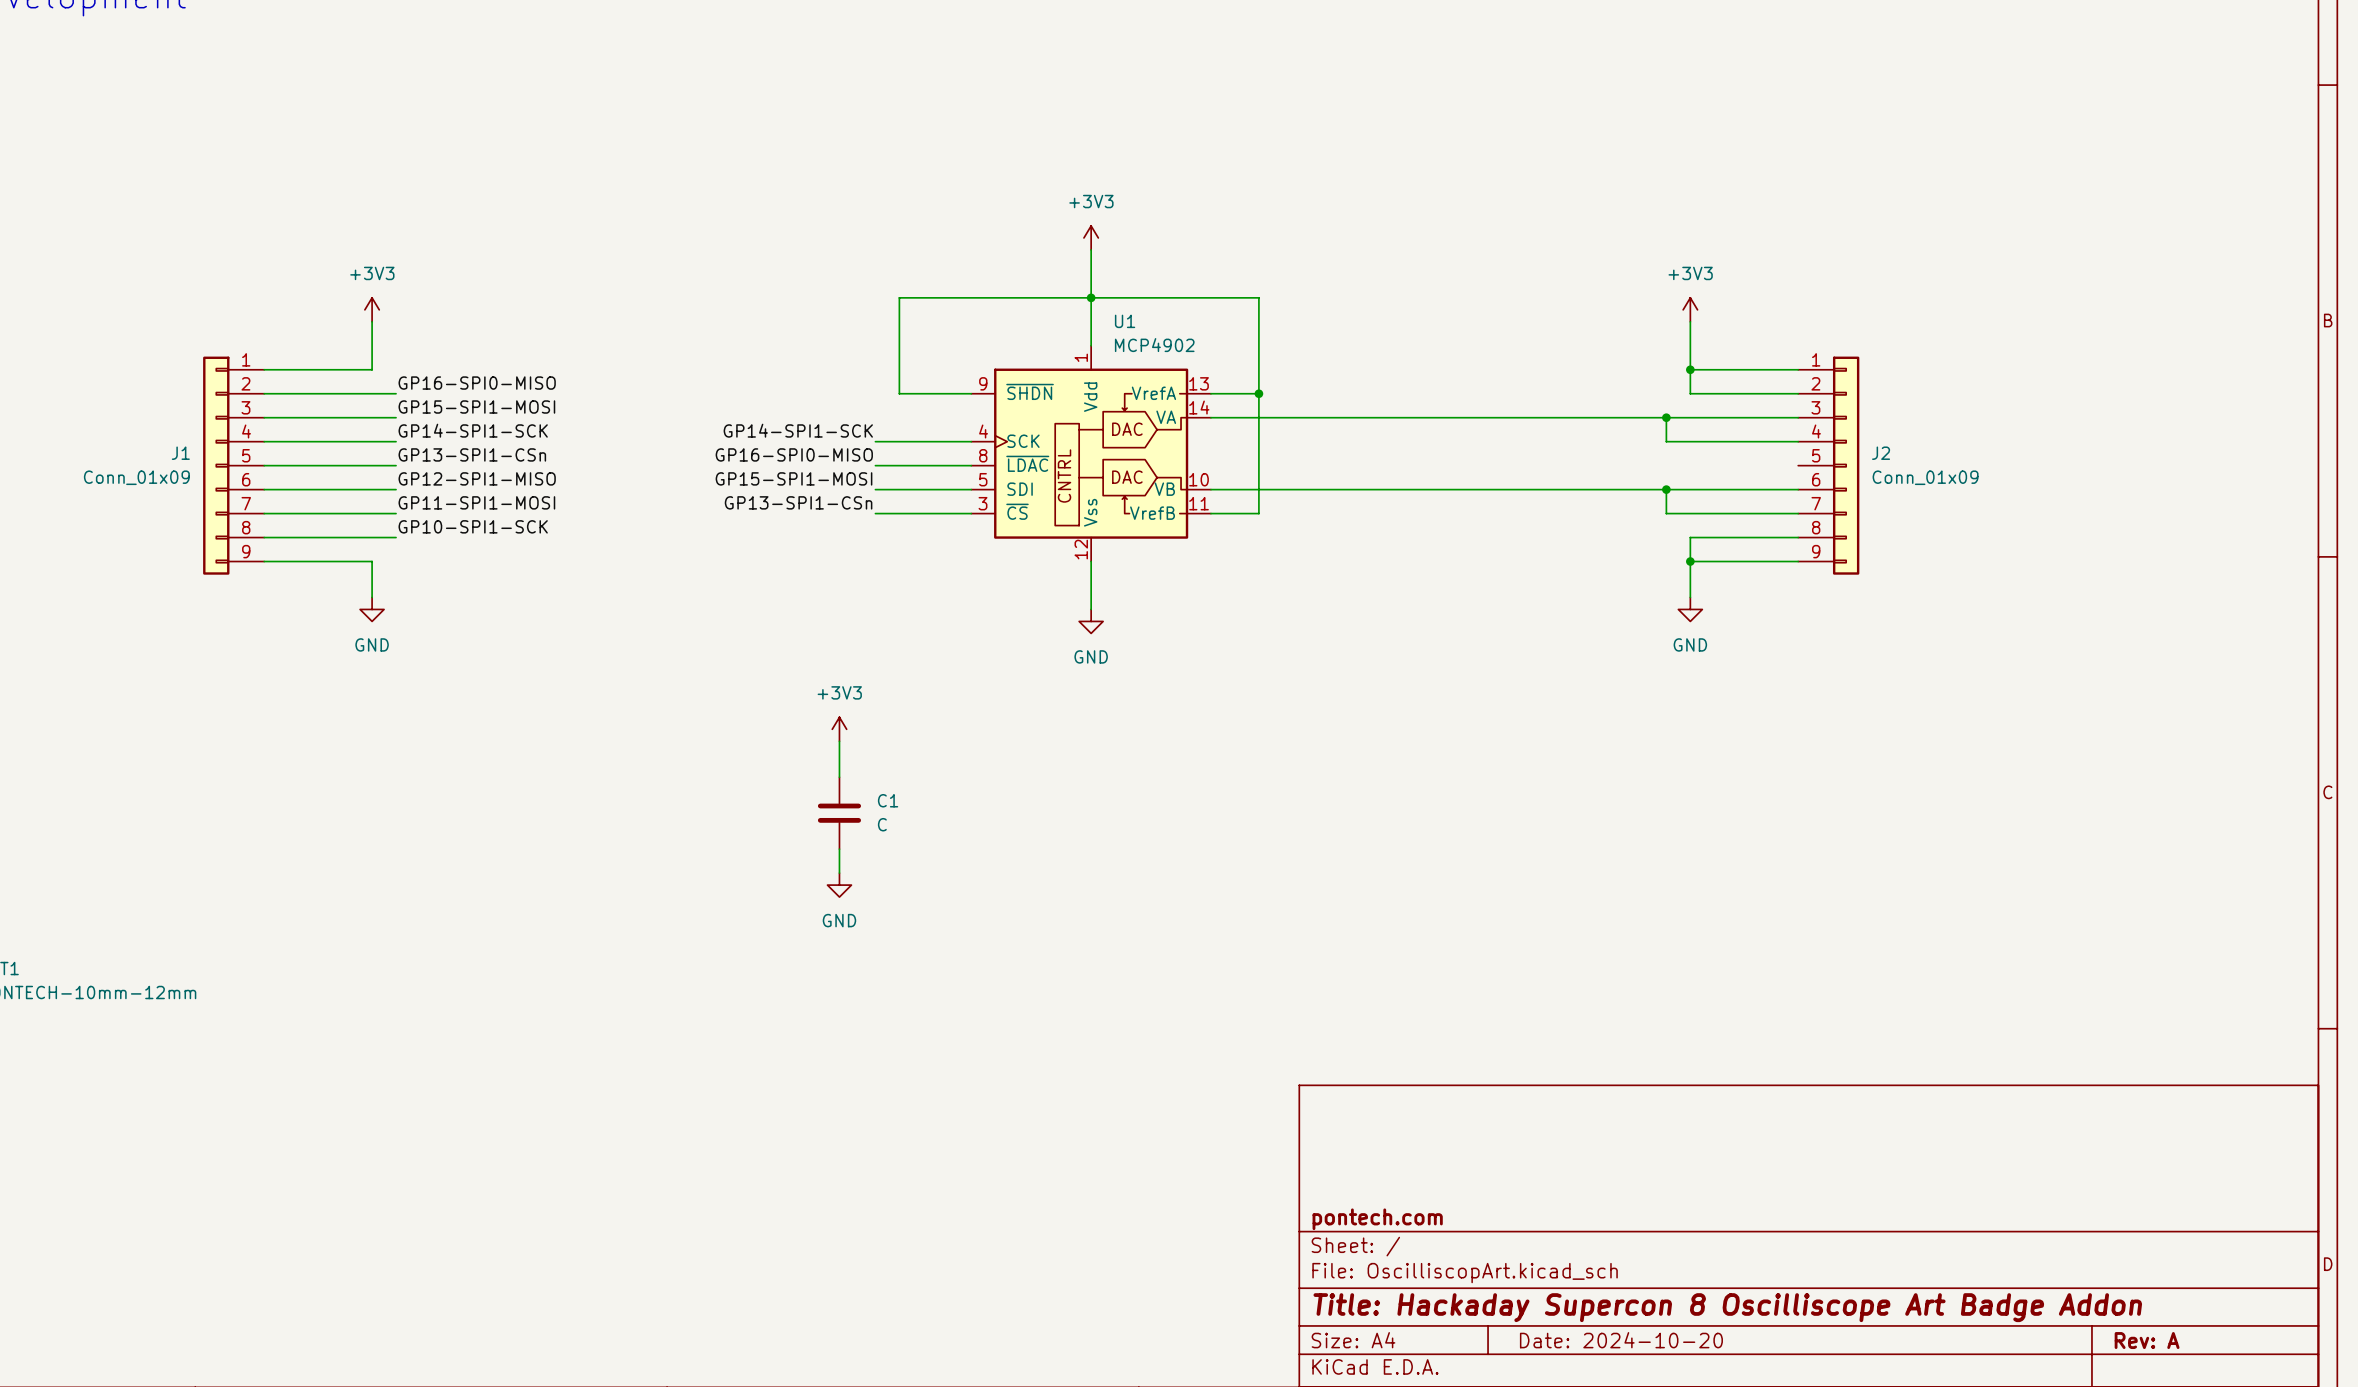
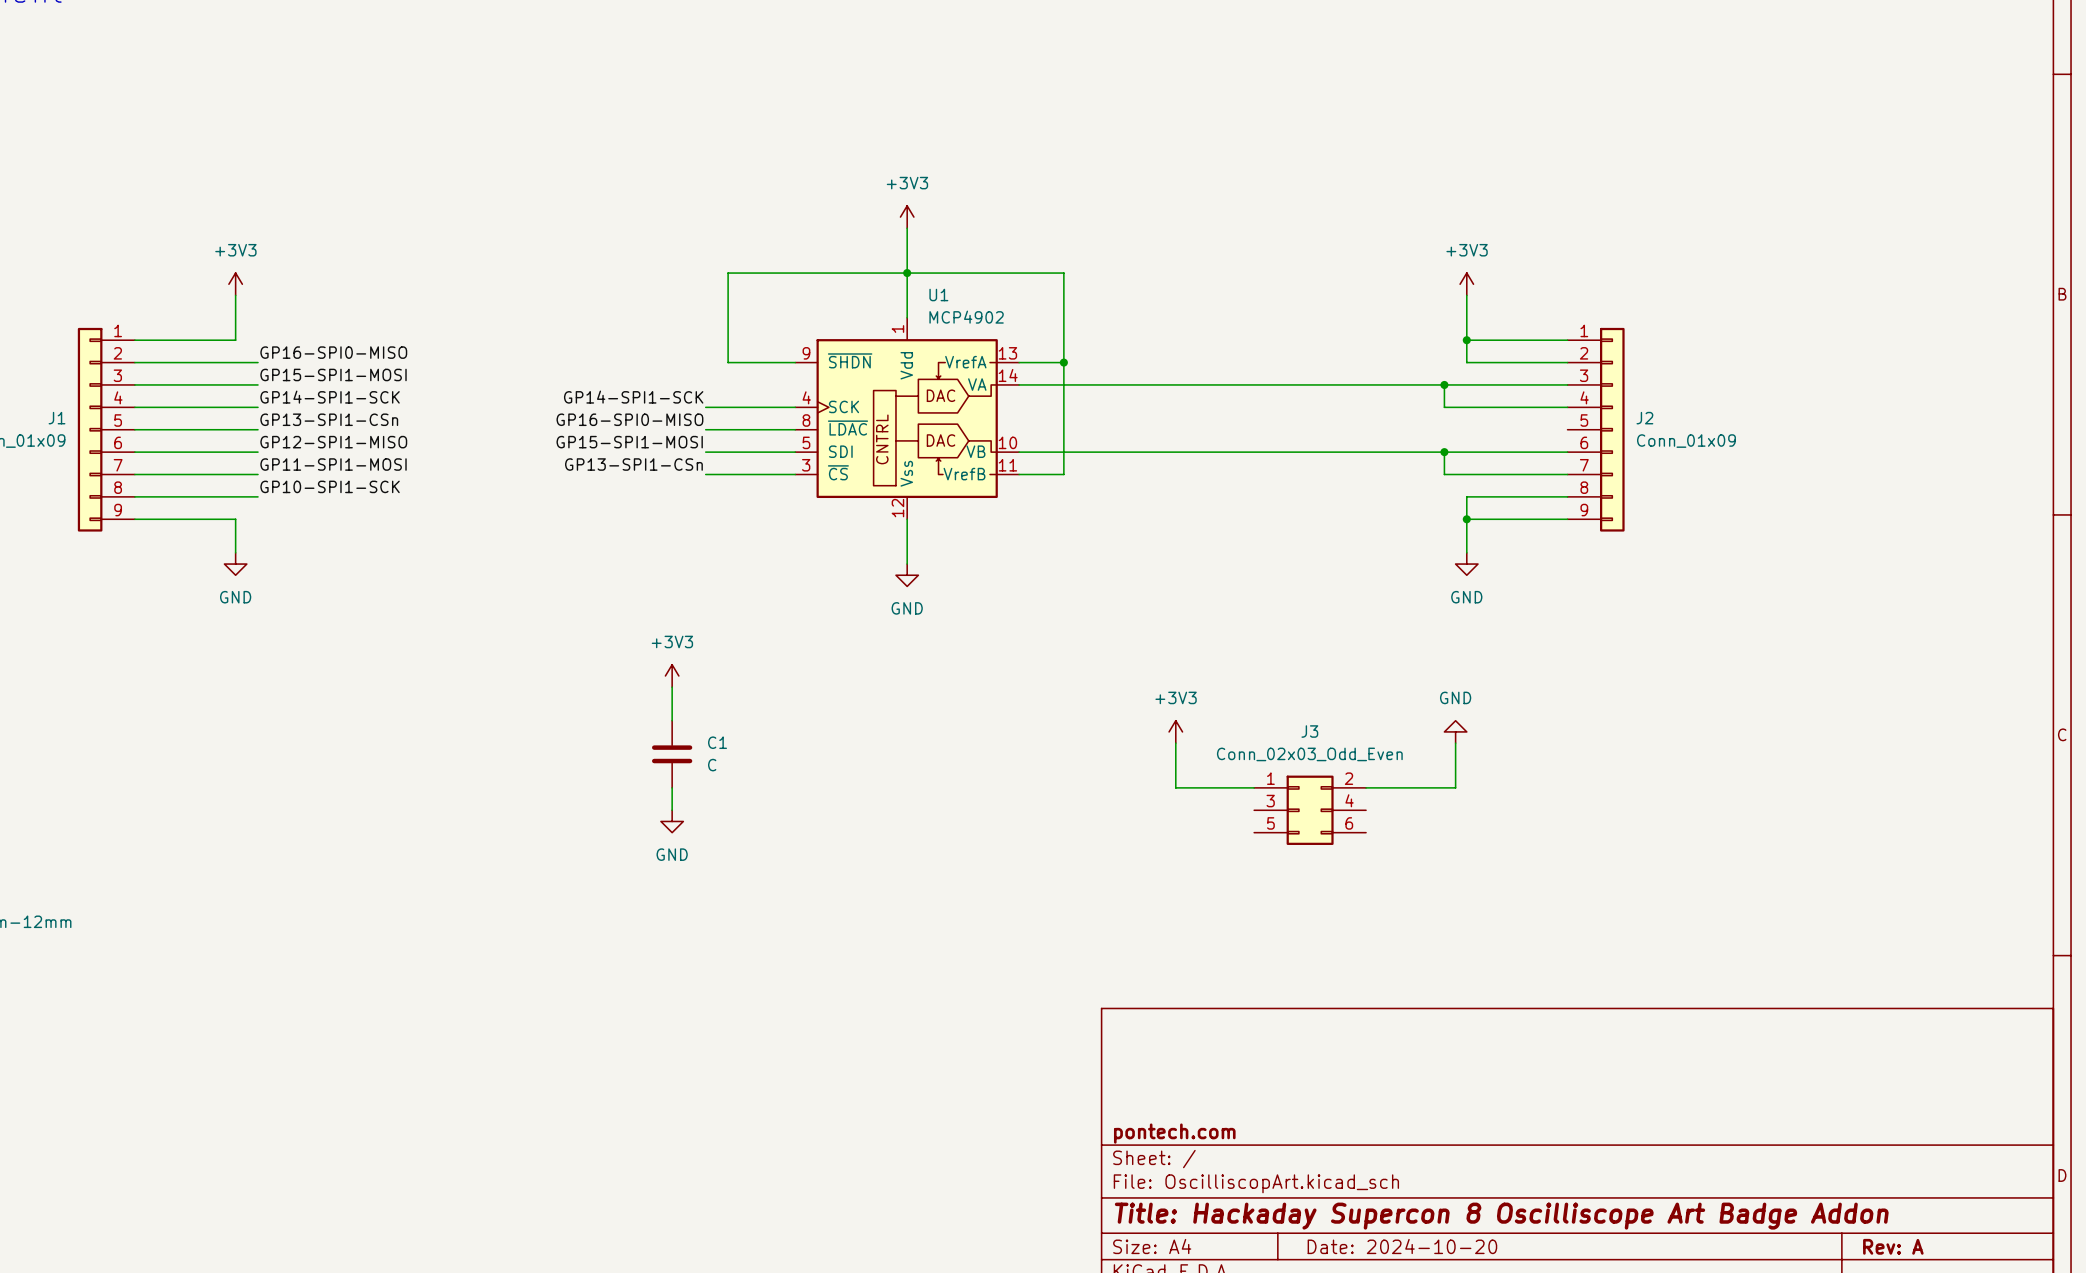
power symbol: none -> +3V3 (1175, 731)
power symbol: none -> GND (1455, 731)
wire: none -> (1175, 743) (1175, 787) (1254, 787)
wire: none -> (1455, 743) (1455, 787) (1366, 787)
J3: none -> Conn_02x03_Odd_Even (1310, 810)

